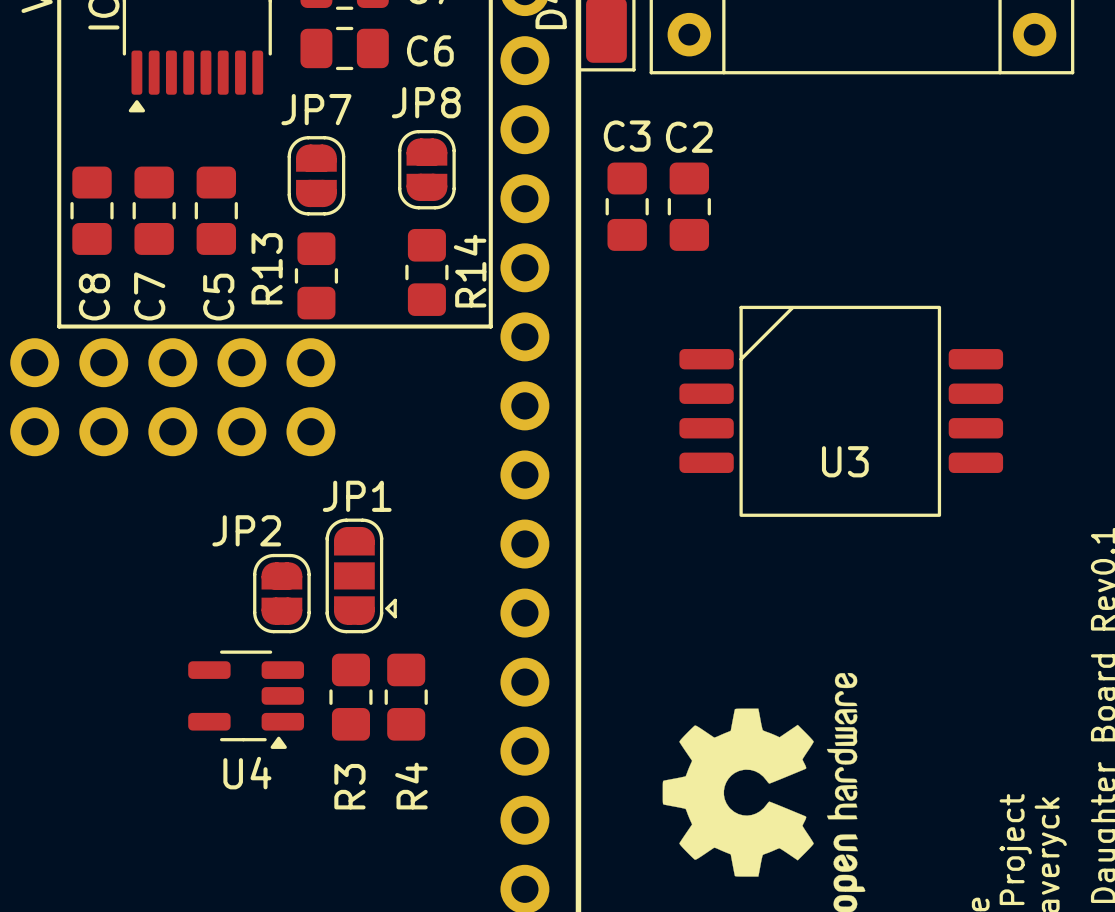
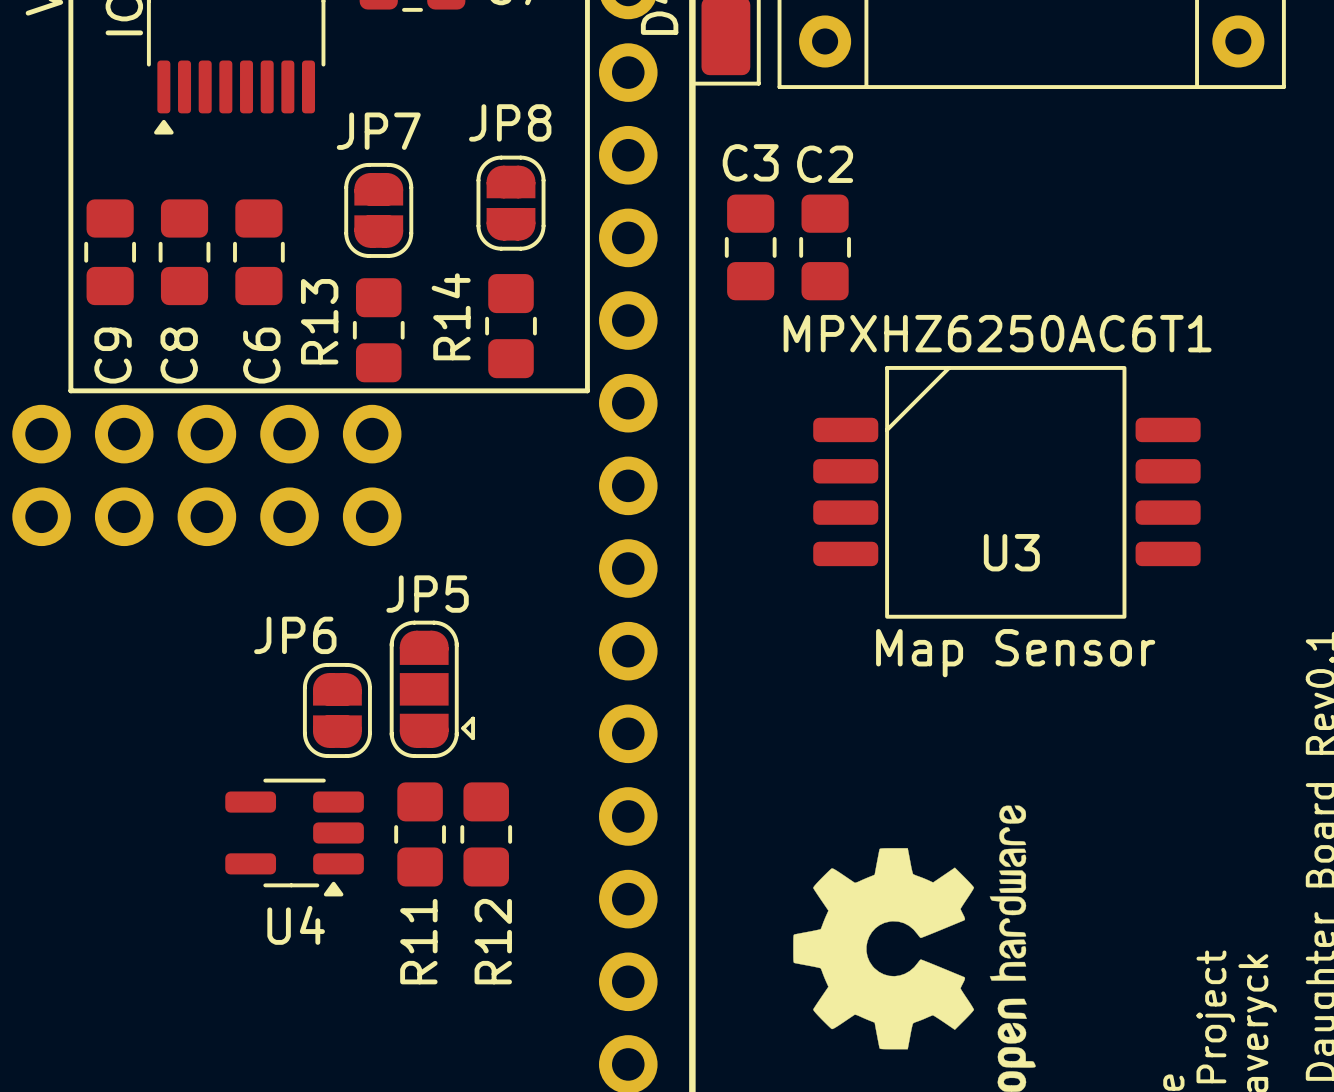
C6: (344, 48) -> none
R14 name position: R14 (470, 271) -> R14 (451, 316)
U3 value: none -> MPXHZ6250AC6T1 (997, 333)
C7 name: C7 (149, 296) -> C8 (179, 355)
C8 name: C8 (94, 297) -> C9 (113, 355)
C5 name: C5 (218, 297) -> C6 (261, 355)
JP1 name: JP1 (357, 496) -> JP5 (427, 594)
JP2 name: JP2 (246, 530) -> JP6 (295, 635)
U3 text: none -> Map Sensor (1015, 653)
R3 name: R3 (349, 786) -> R11 (418, 941)
R4 name: R4 (411, 786) -> R12 (493, 941)

